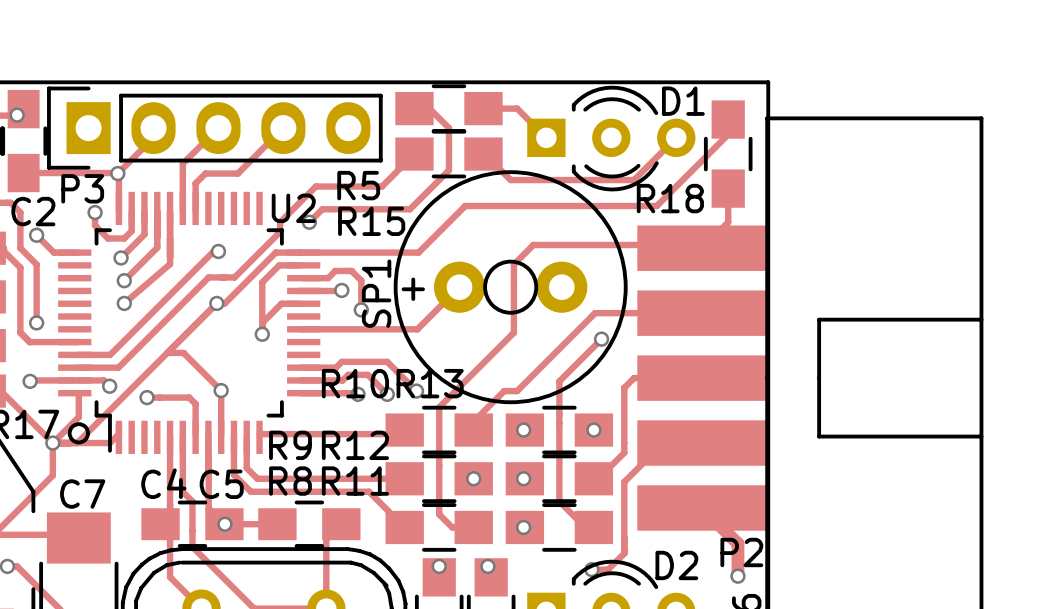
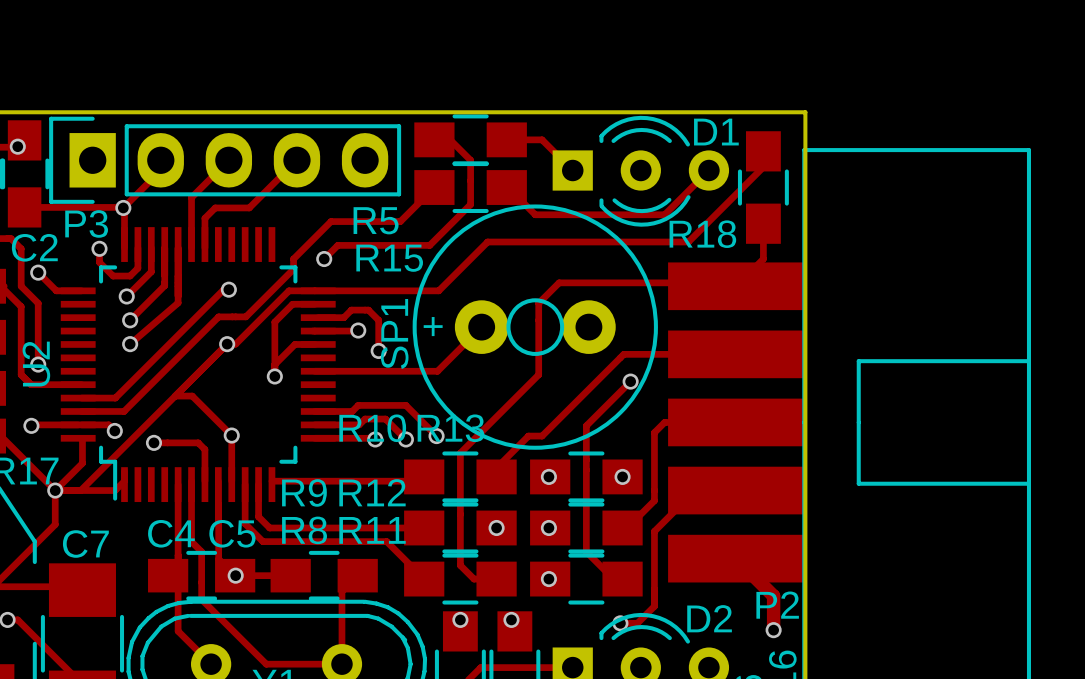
U2 footprint: [58, 191, 321, 454] -> [60, 227, 336, 503]
U2 name position: U2 (293, 208) -> U2 (36, 364)

